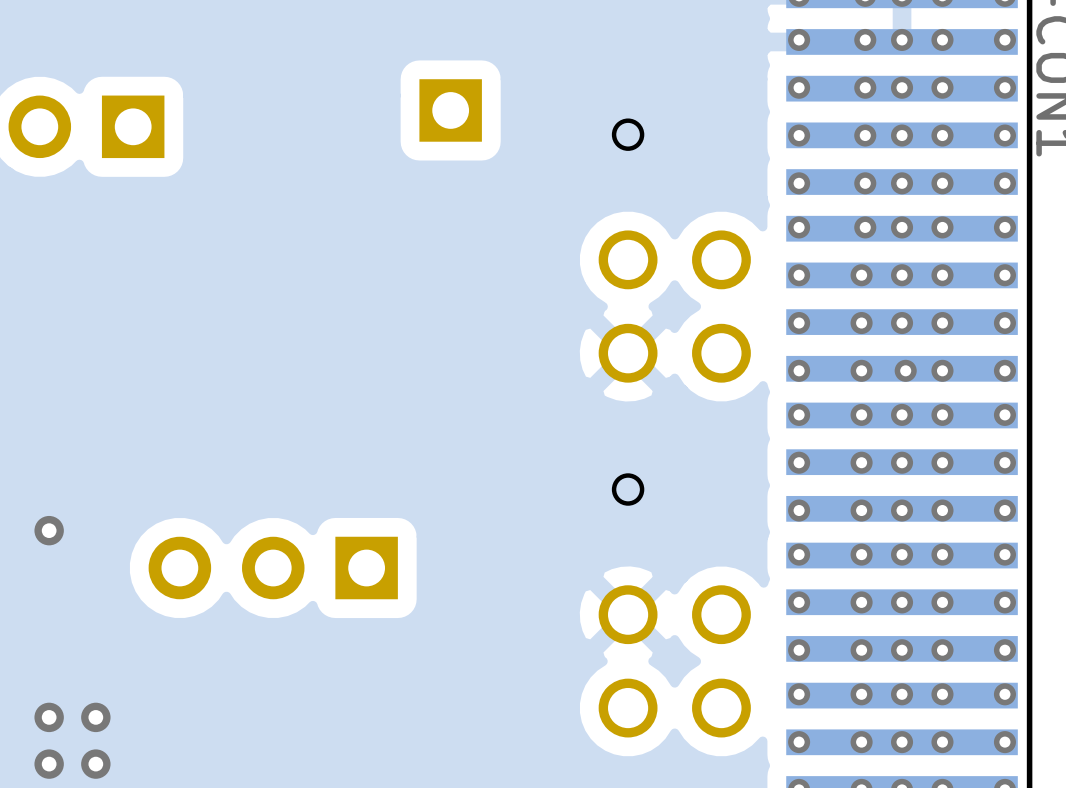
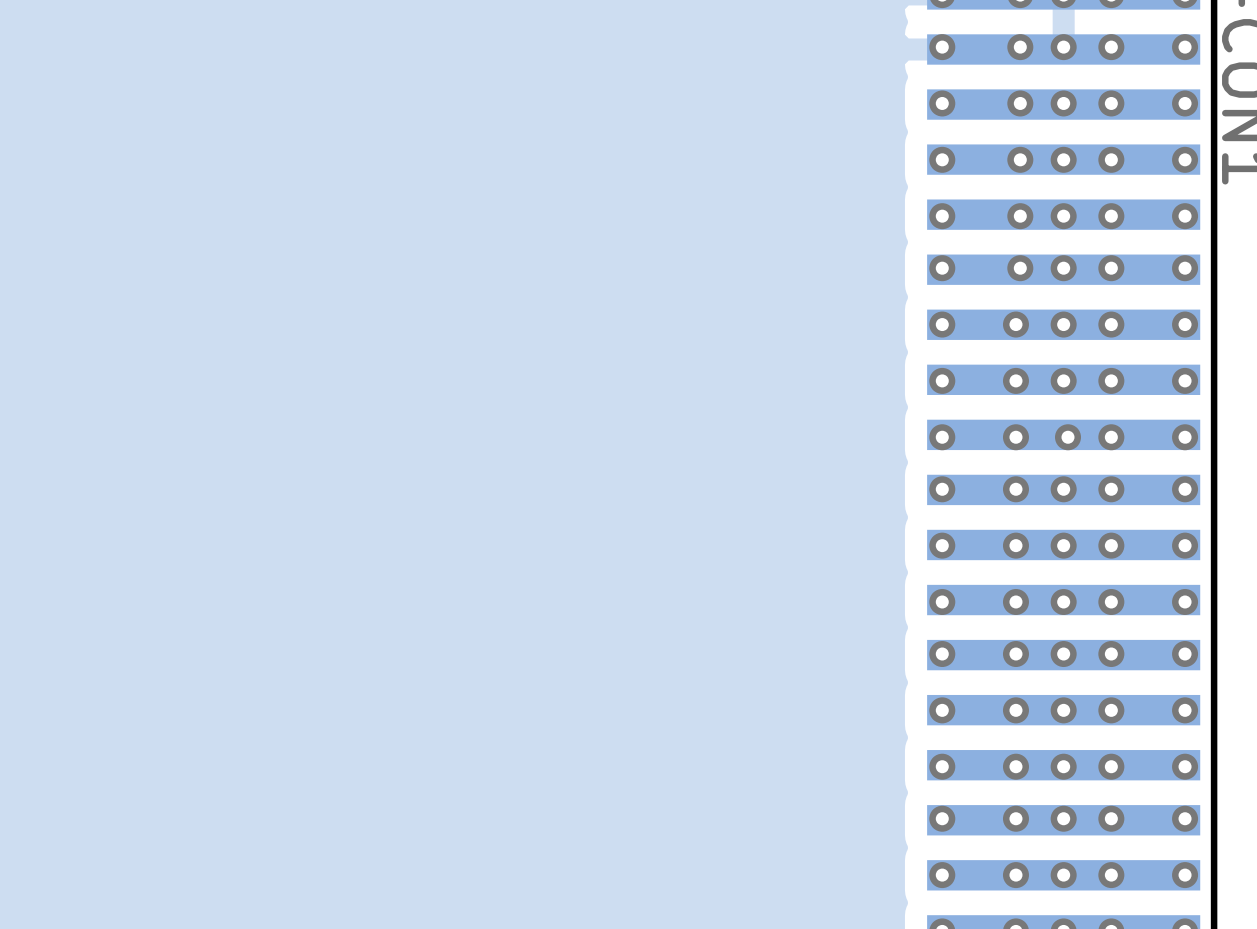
part: (450, 110) -> none
part: (86, 126) -> none
part: (674, 250) -> none
via: (49, 530) -> none
part: (273, 568) -> none
part: (674, 605) -> none
via: (49, 717) -> none
via: (95, 717) -> none
via: (49, 764) -> none
via: (95, 764) -> none

